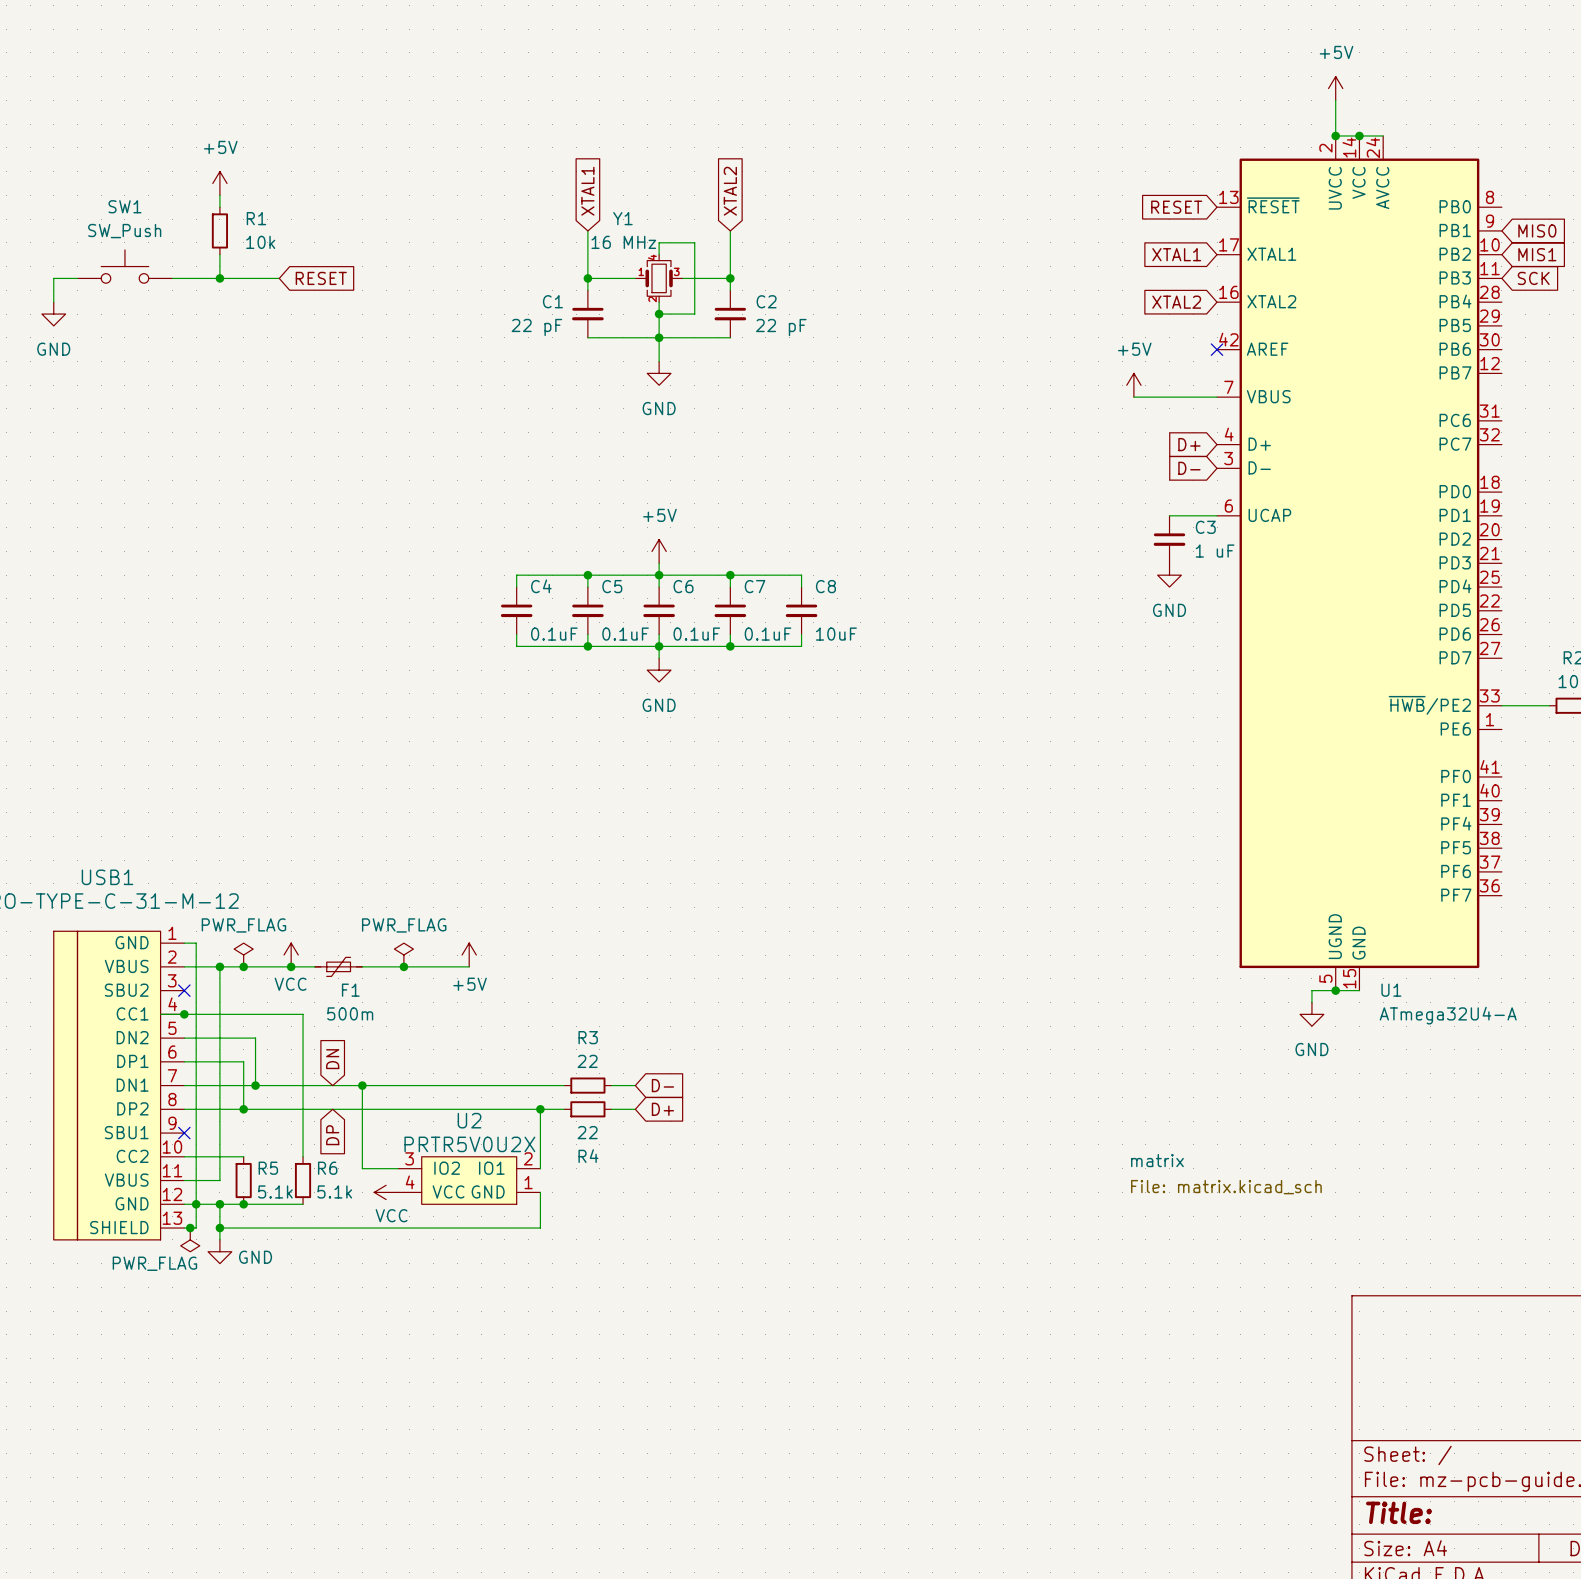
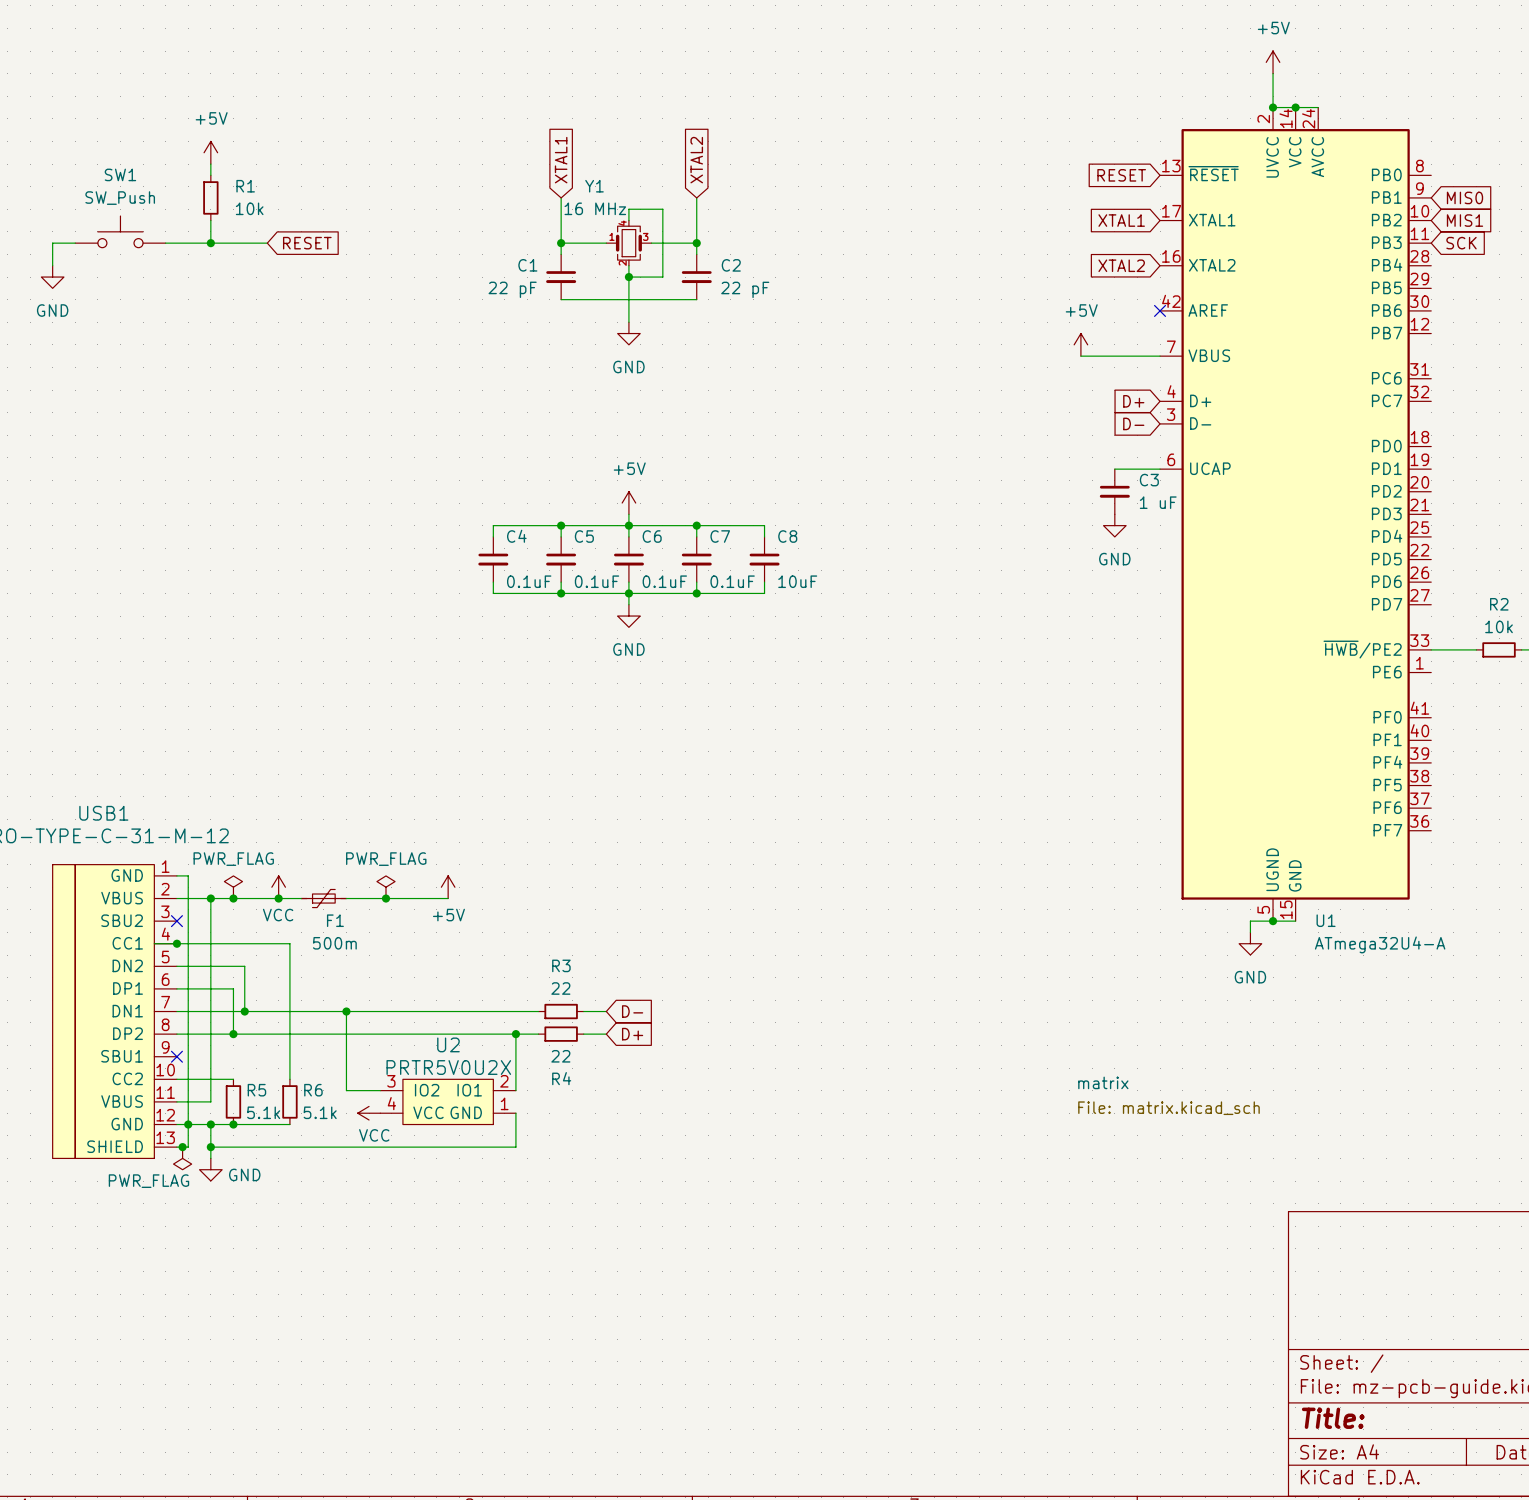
junction: (659, 337) -> none
global label: DN (332, 1059) -> none
global label: DP (332, 1135) -> none

